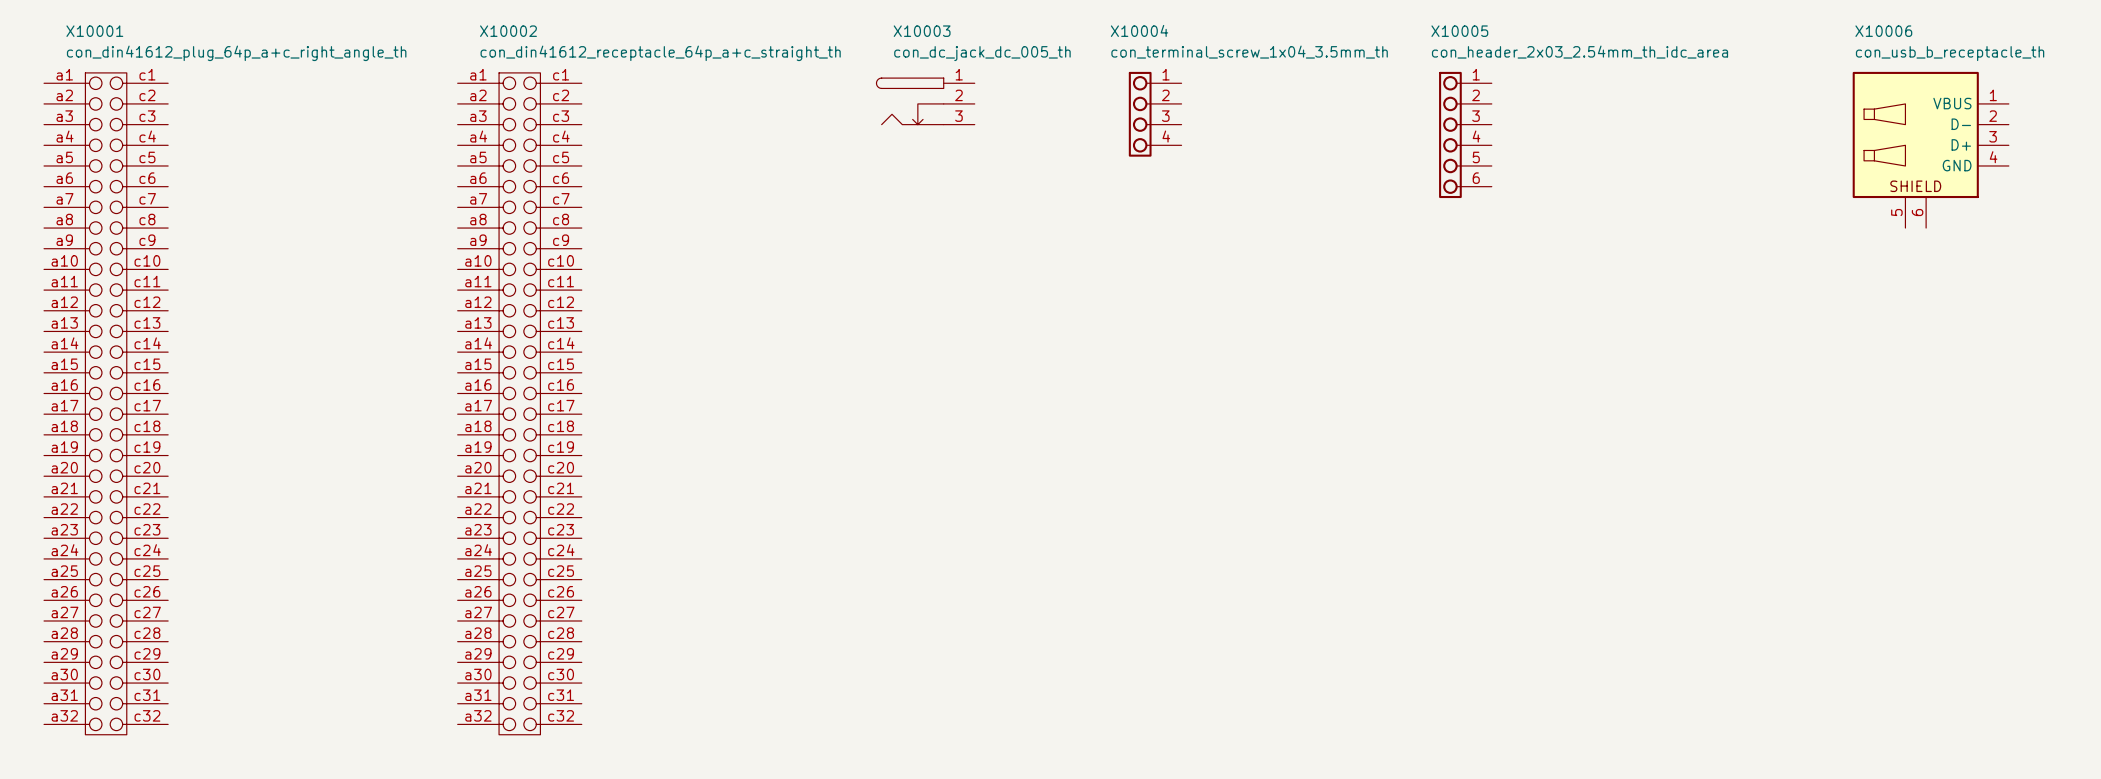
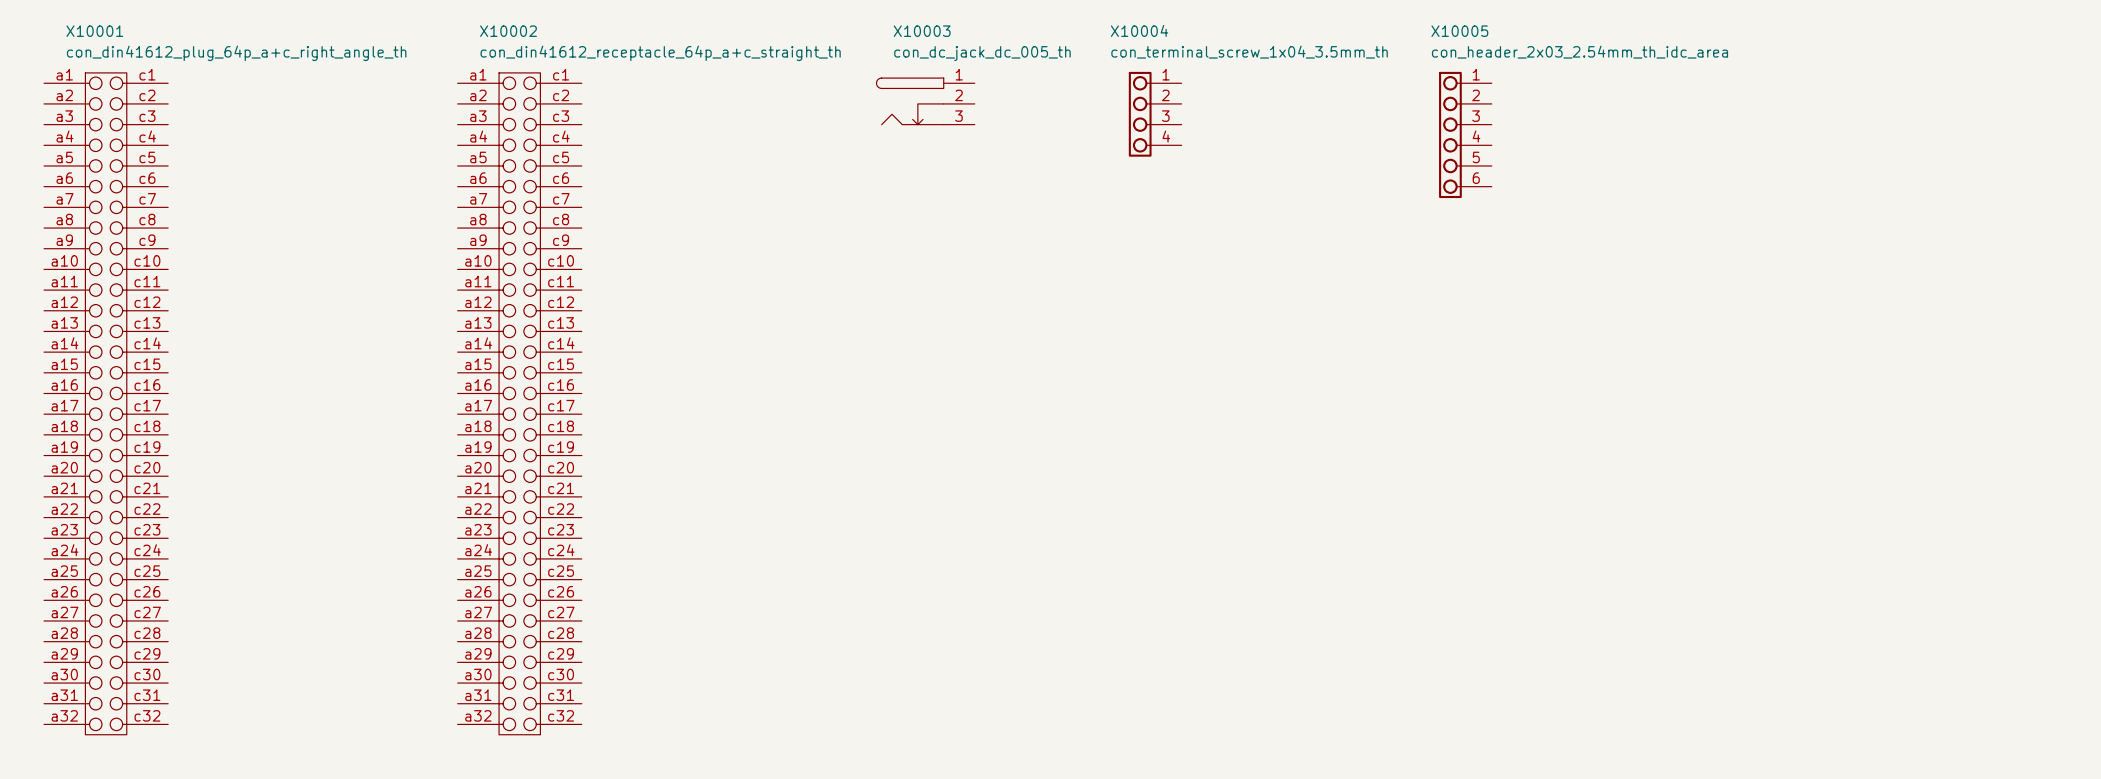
X10006: con_usb_b_receptacle_th (1930, 149) -> none

